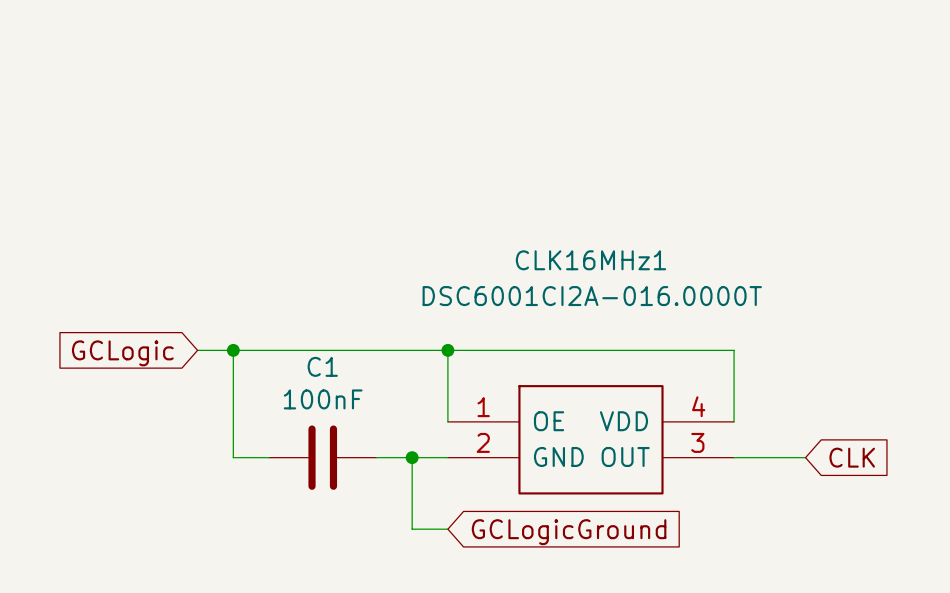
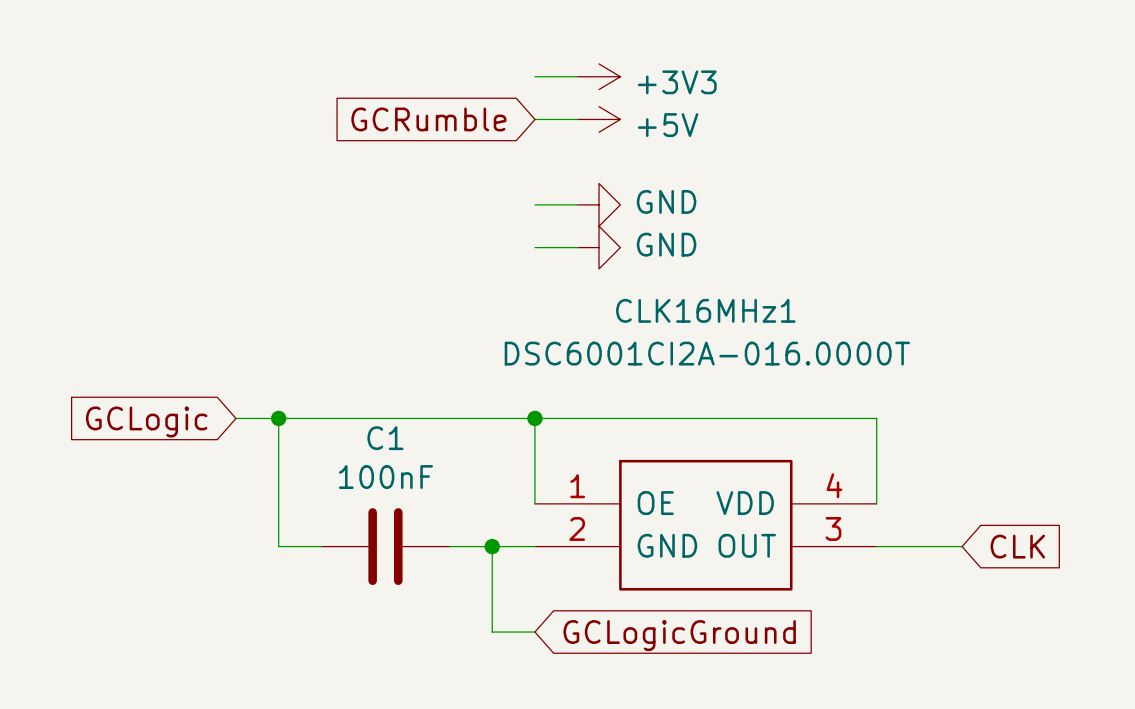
wire: none -> (534, 76) (577, 76)
power symbol: none -> +3V3 (599, 76)
global label: none -> GCRumble (428, 119)
wire: none -> (534, 119) (577, 119)
power symbol: none -> +5V (599, 119)
wire: none -> (534, 204) (577, 204)
power symbol: none -> GND (599, 204)
wire: none -> (534, 247) (577, 247)
power symbol: none -> GND (599, 247)

